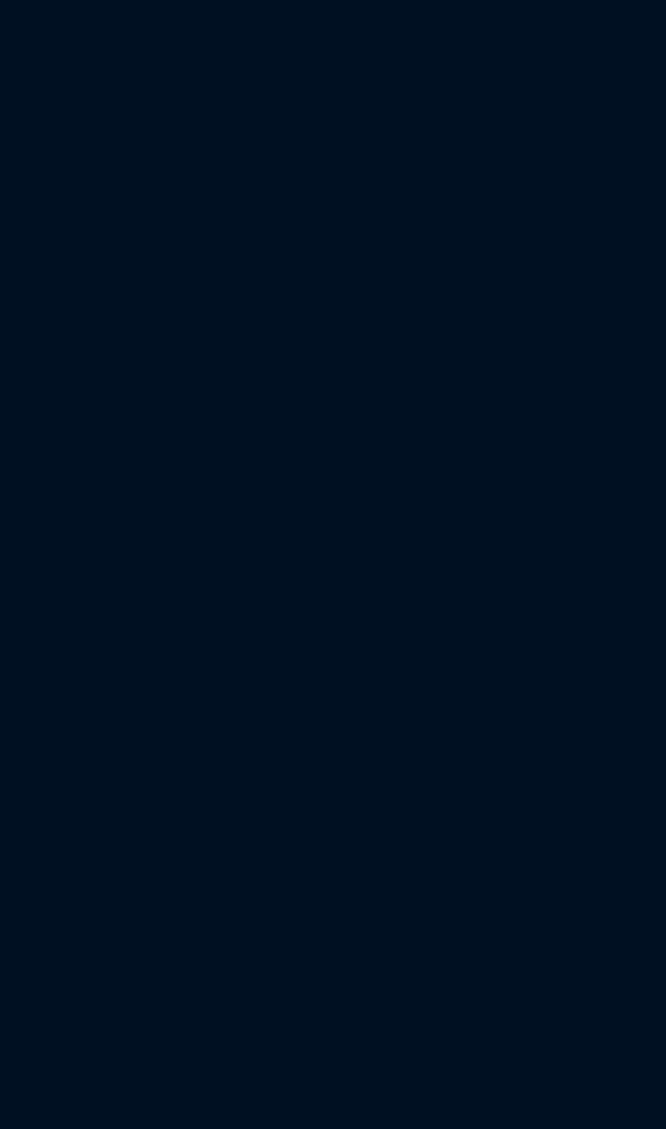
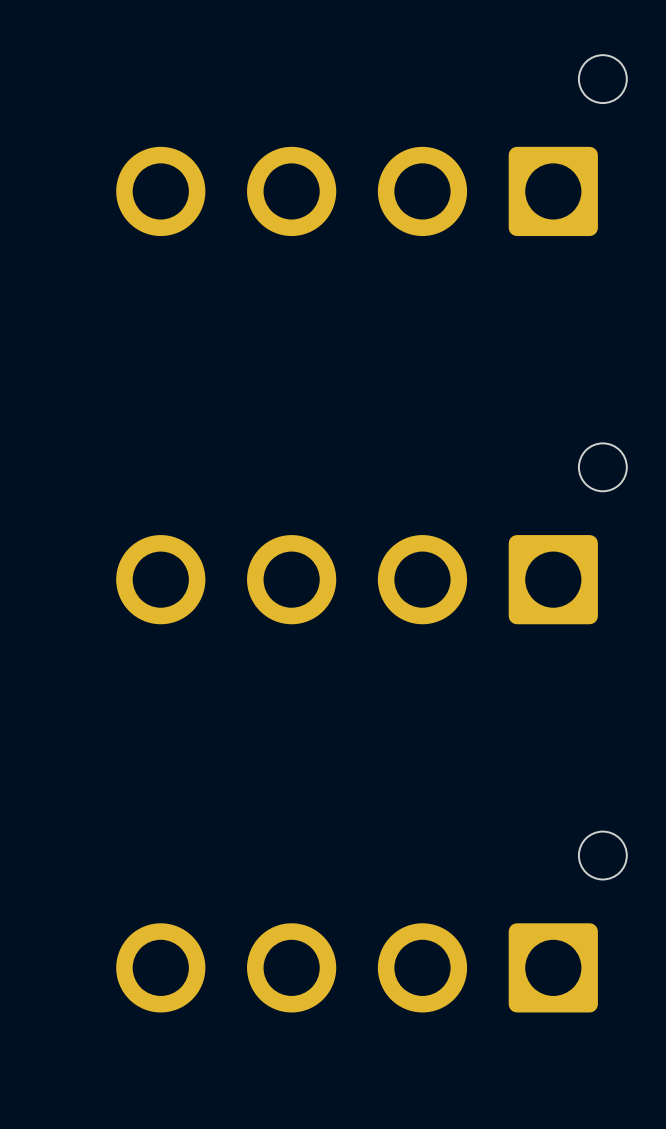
part: none -> (371, 145)
part: none -> (371, 533)
part: none -> (371, 922)

